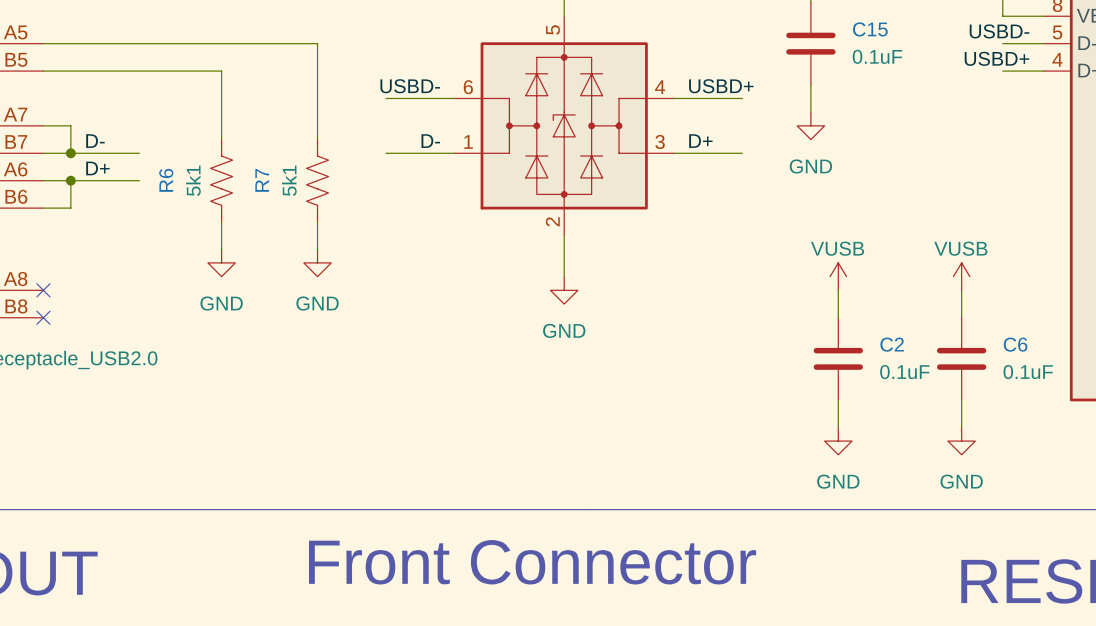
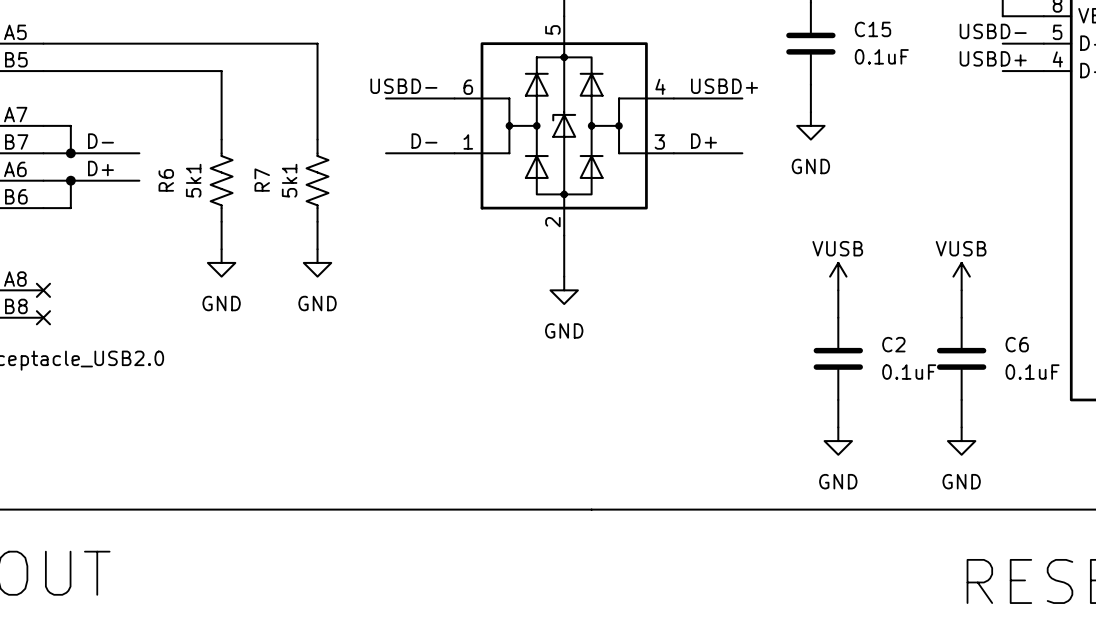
text: Front Connector (532, 562) -> none

